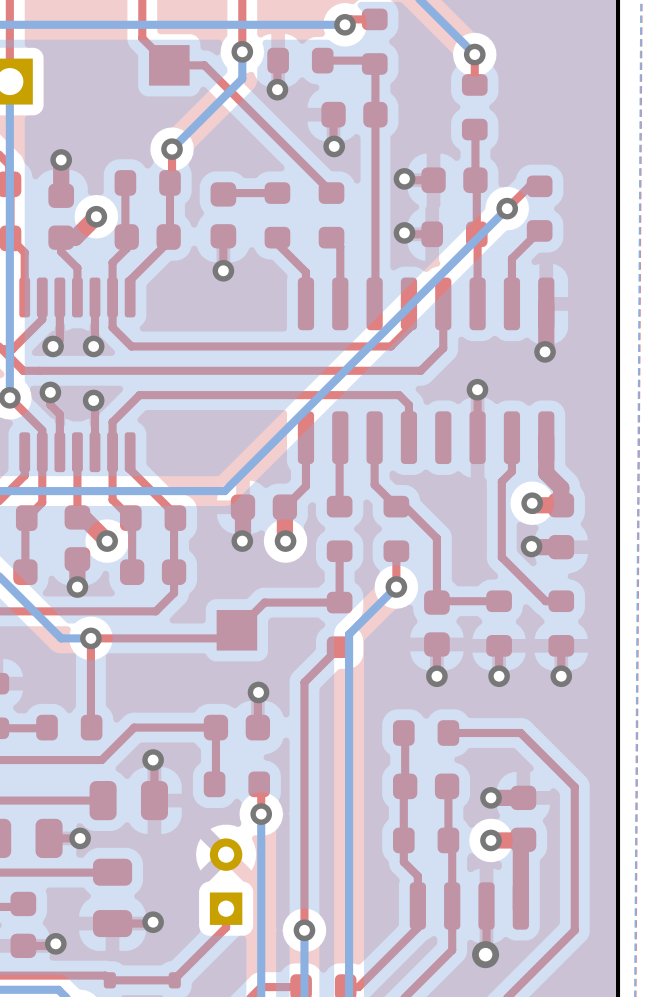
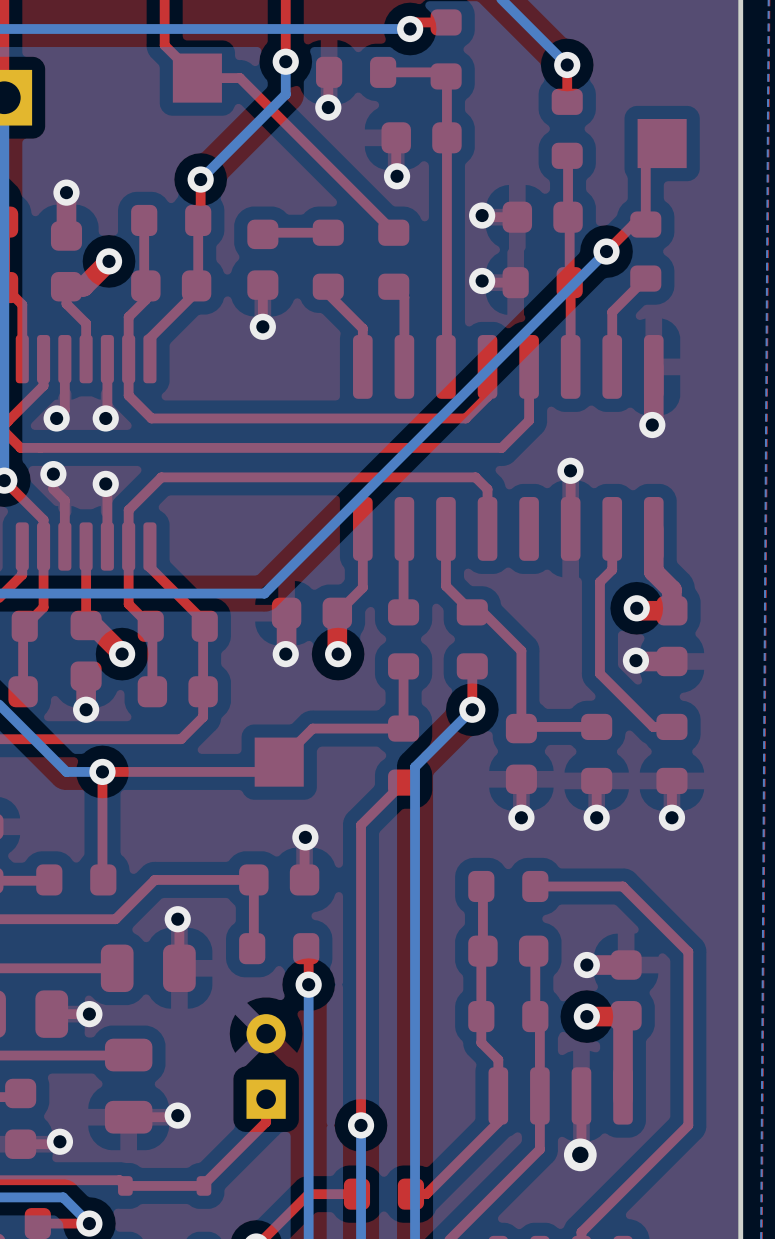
top track: none -> (662, 143) (645, 159) (645, 224)
part: none -> (662, 143)

